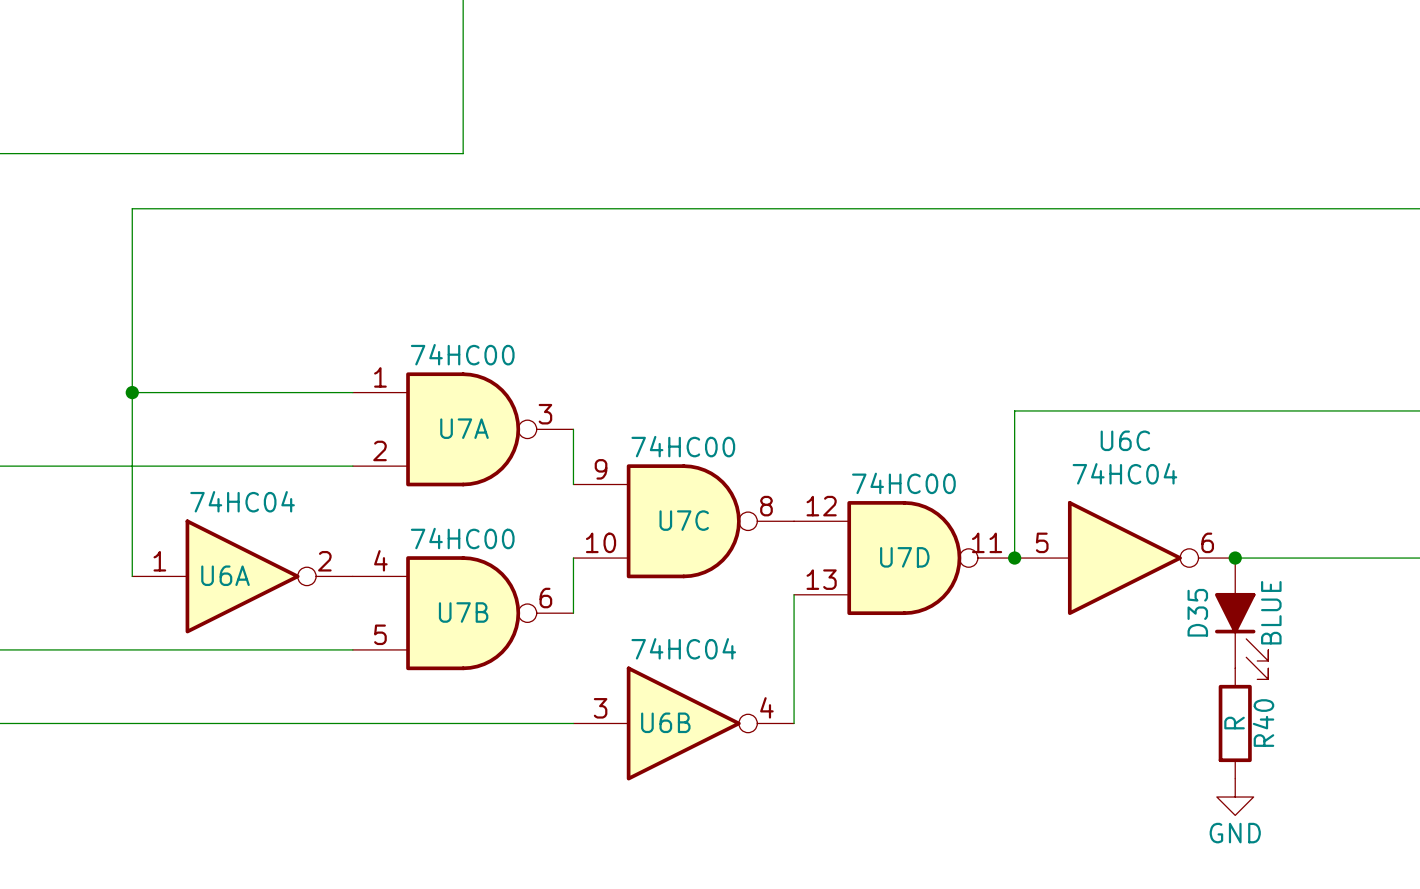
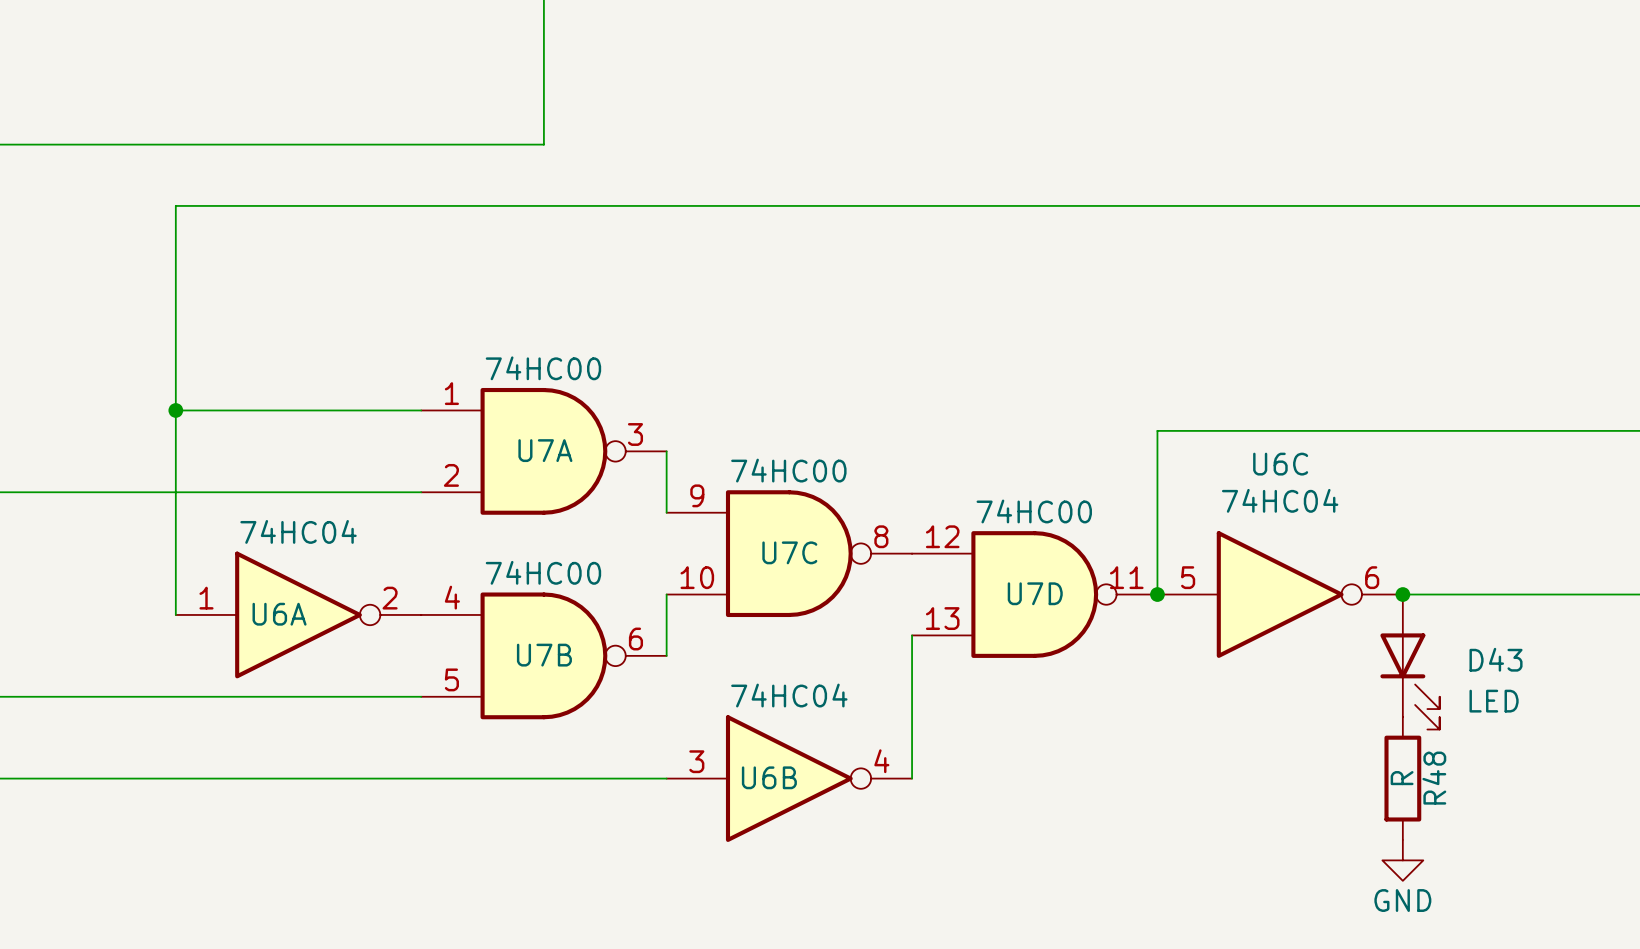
D35: BLUE (1241, 618) -> none
D43: none -> LED (1410, 662)
R40 name: R40 (1263, 723) -> R48 (1434, 778)

